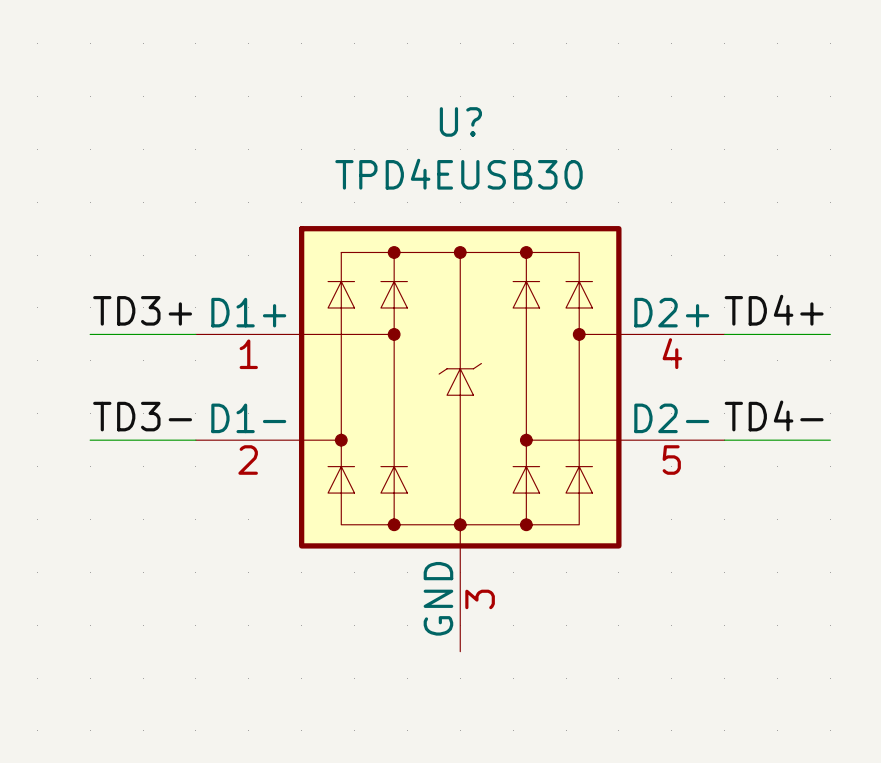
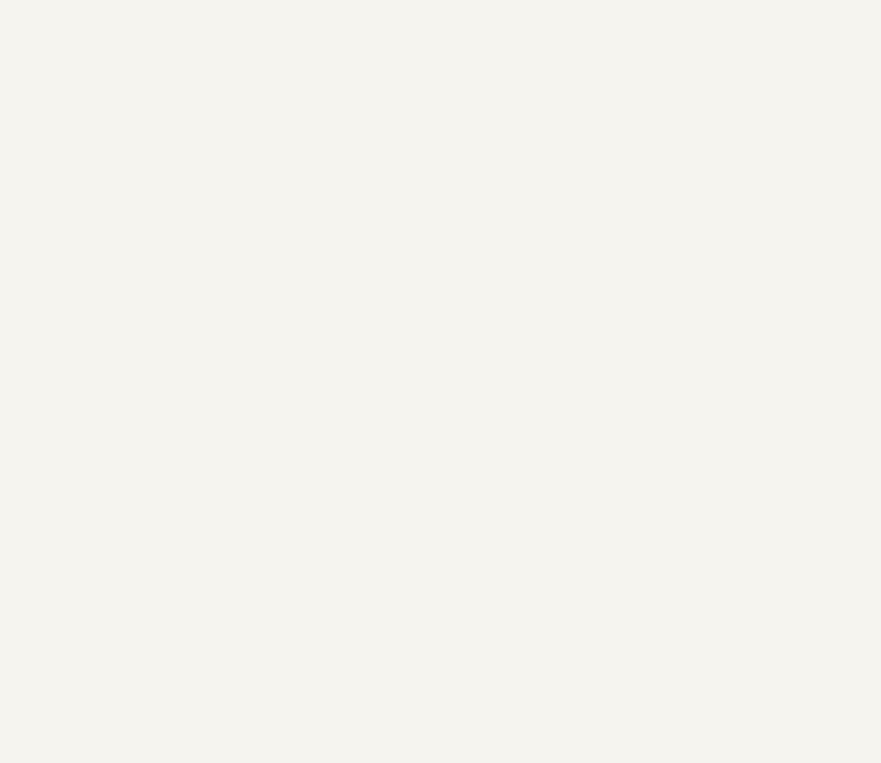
label: TD3+ (142, 310) -> none
label: TD4+ (774, 310) -> none
wire: (90, 334) (195, 334) -> none
wire: (724, 334) (830, 334) -> none
label: TD4- (774, 415) -> none
label: TD3- (142, 416) -> none
U?: TPD4EUSB30 (460, 438) -> none
wire: (90, 440) (195, 440) -> none
wire: (724, 440) (830, 440) -> none

